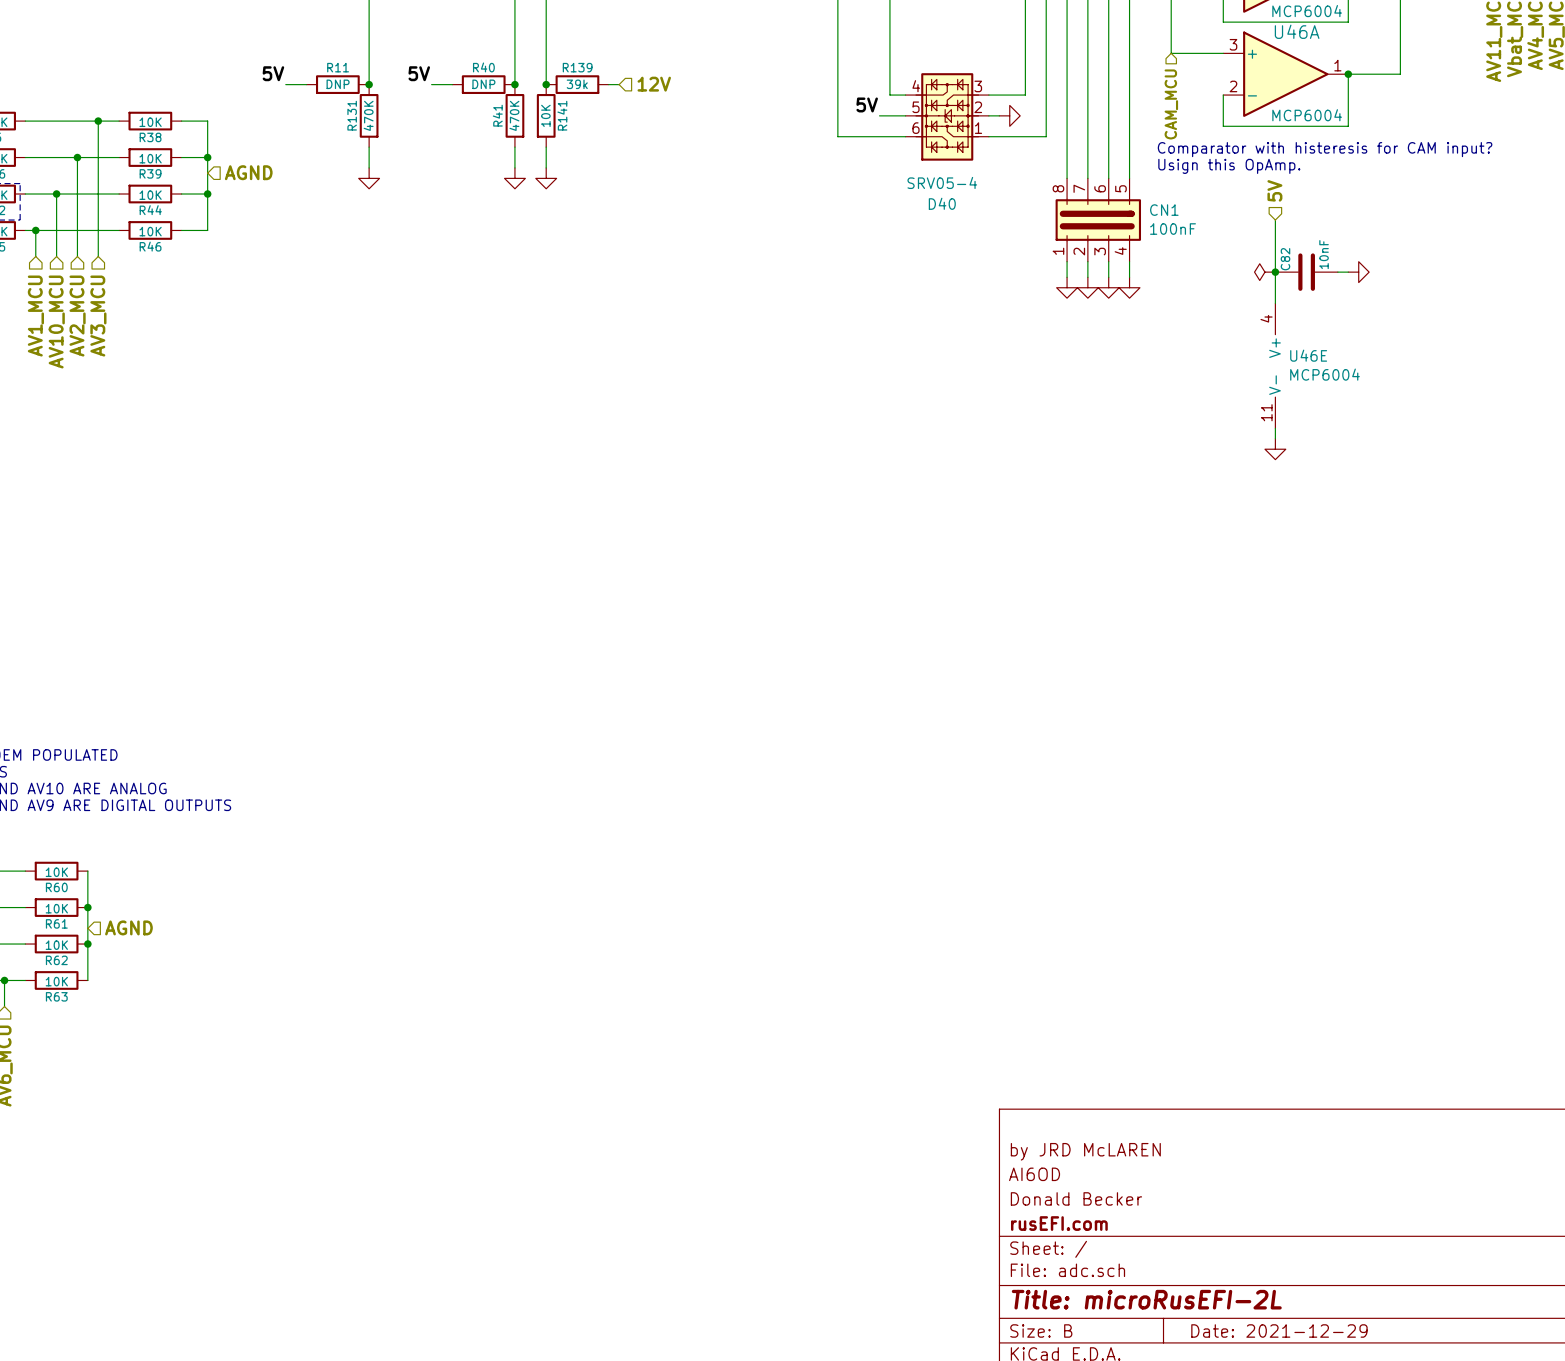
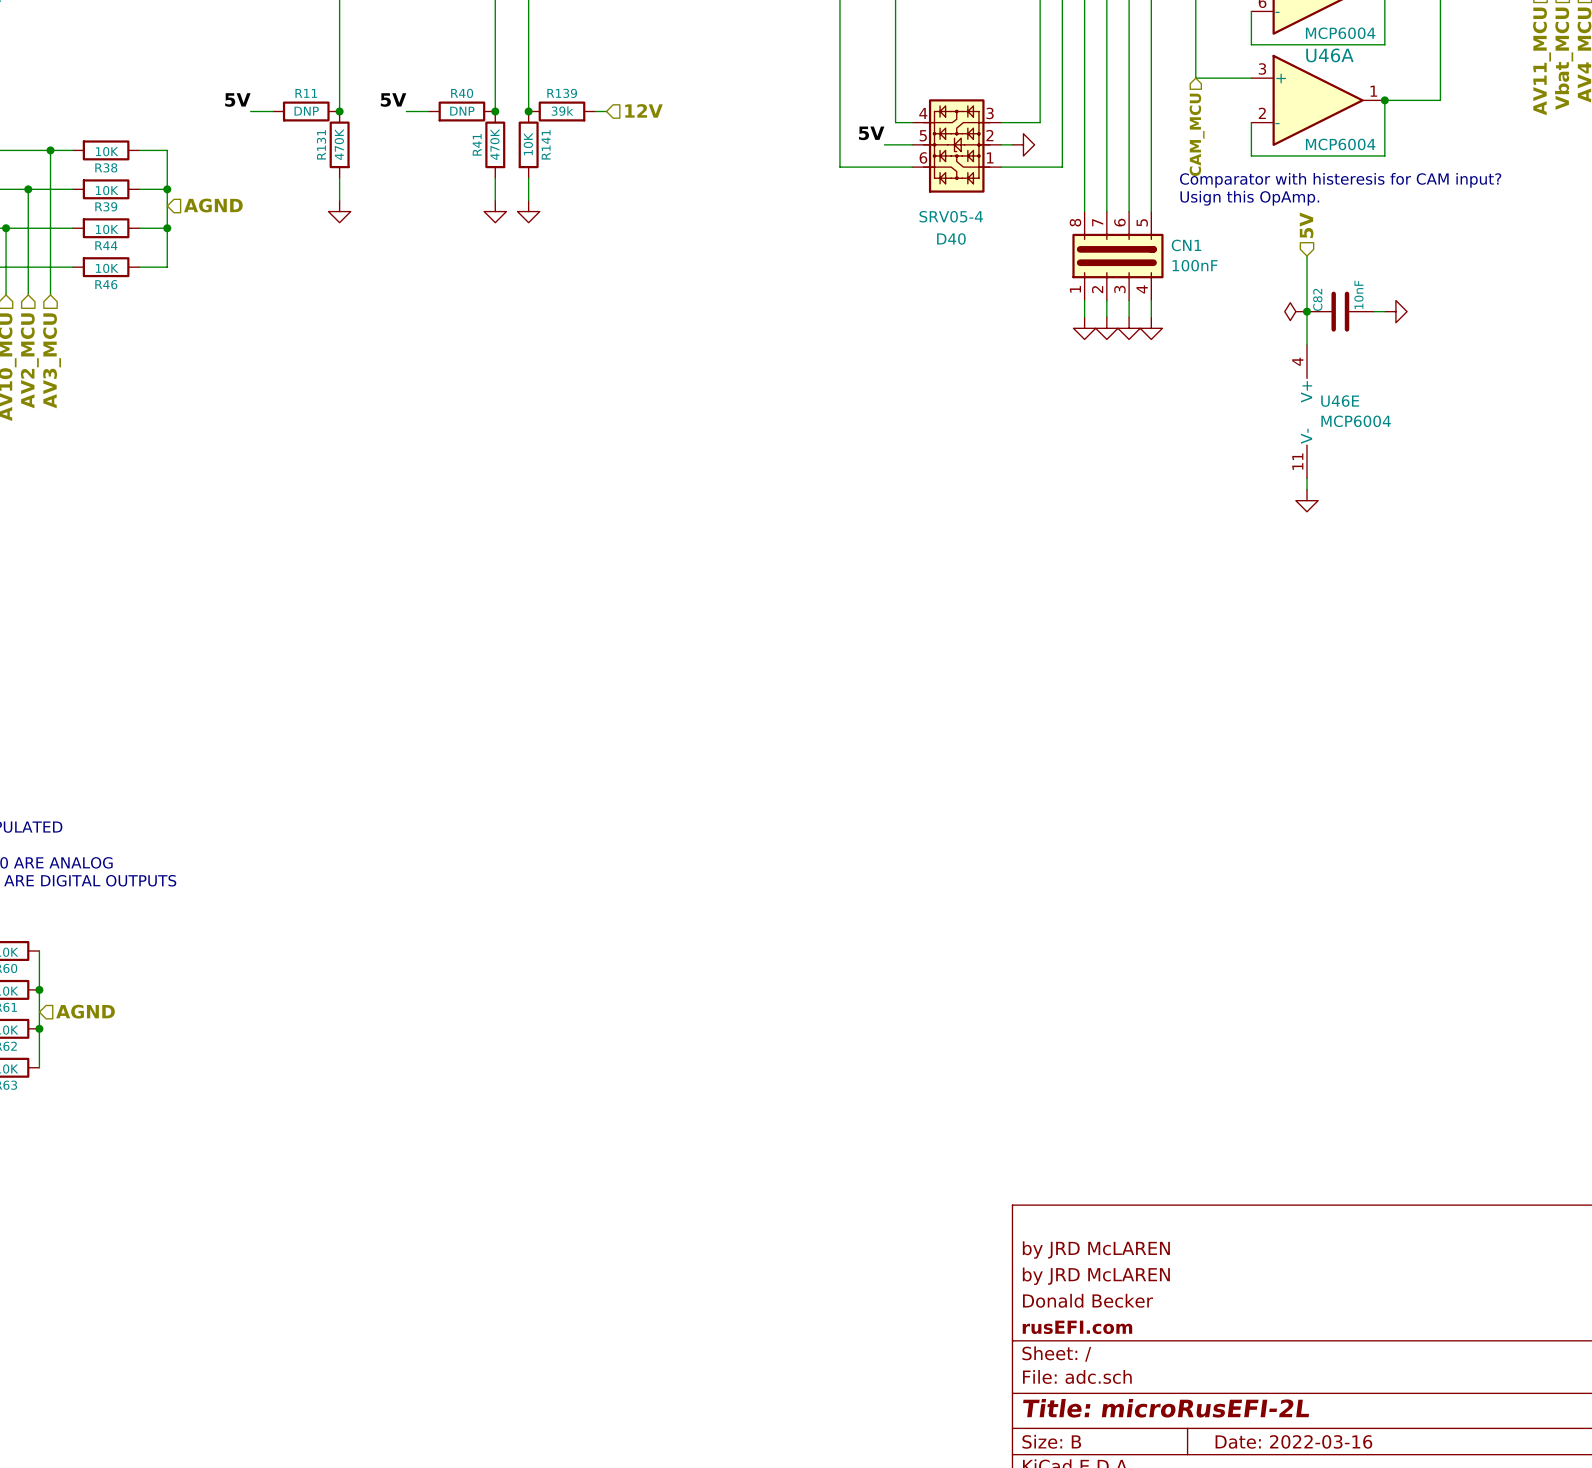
title block: AI6OD (1034, 1174) -> by JRD McLAREN (1096, 1276)
title block: Date: 2021-12-29 (1279, 1330) -> Date: 2022-03-16 (1293, 1441)

